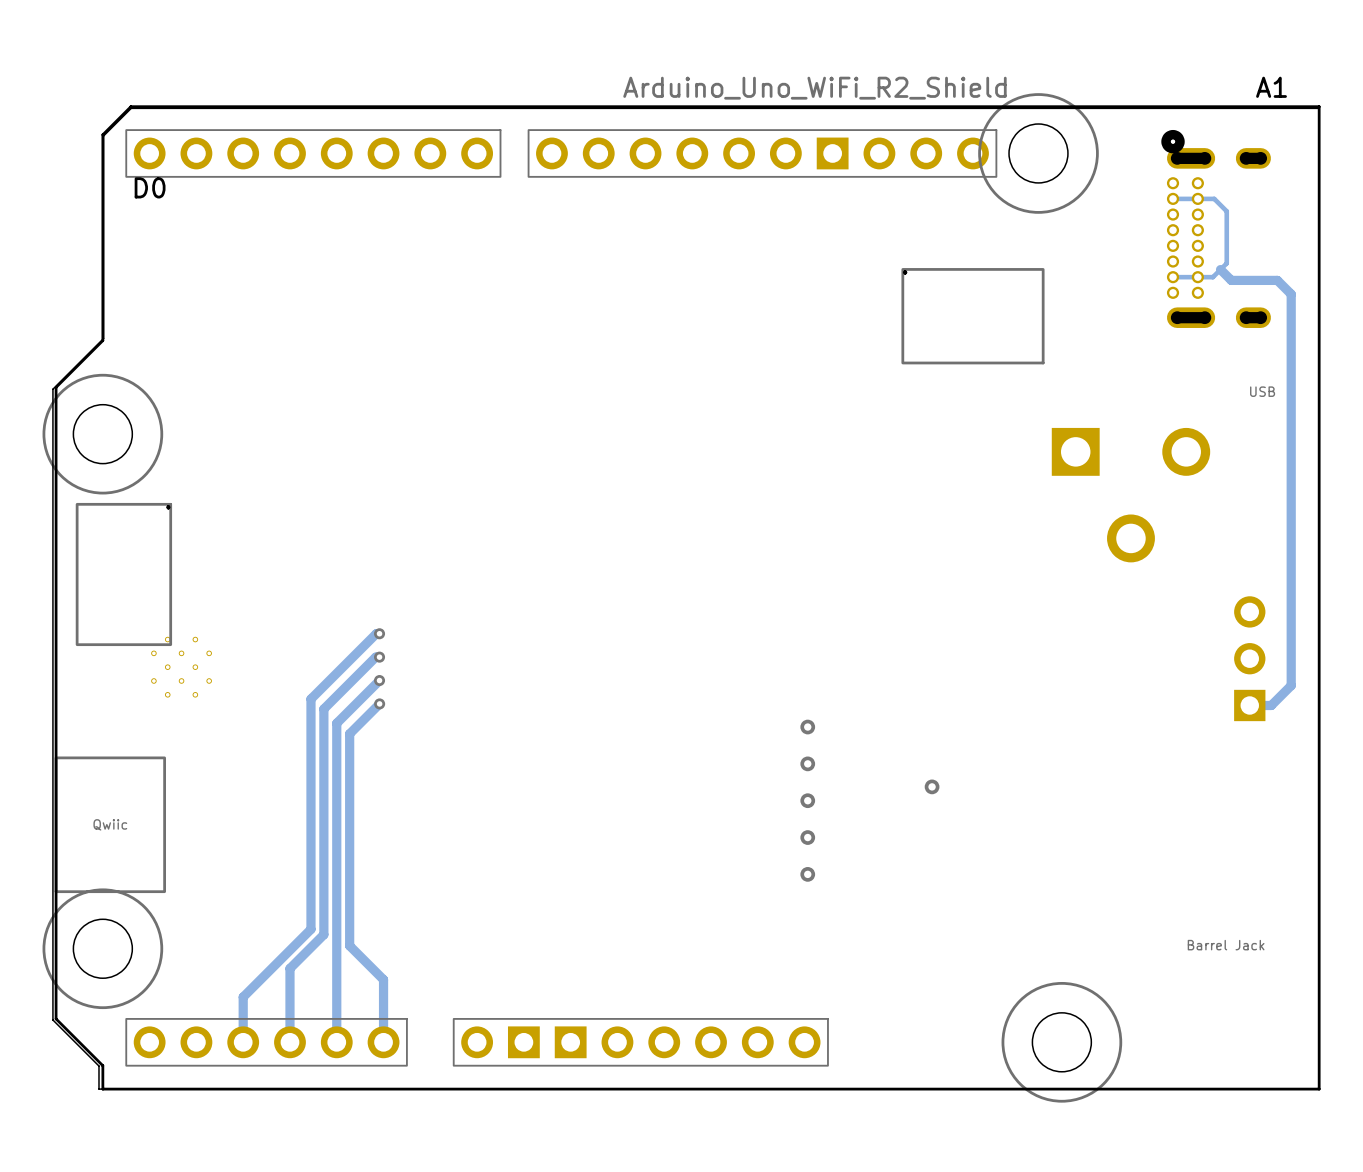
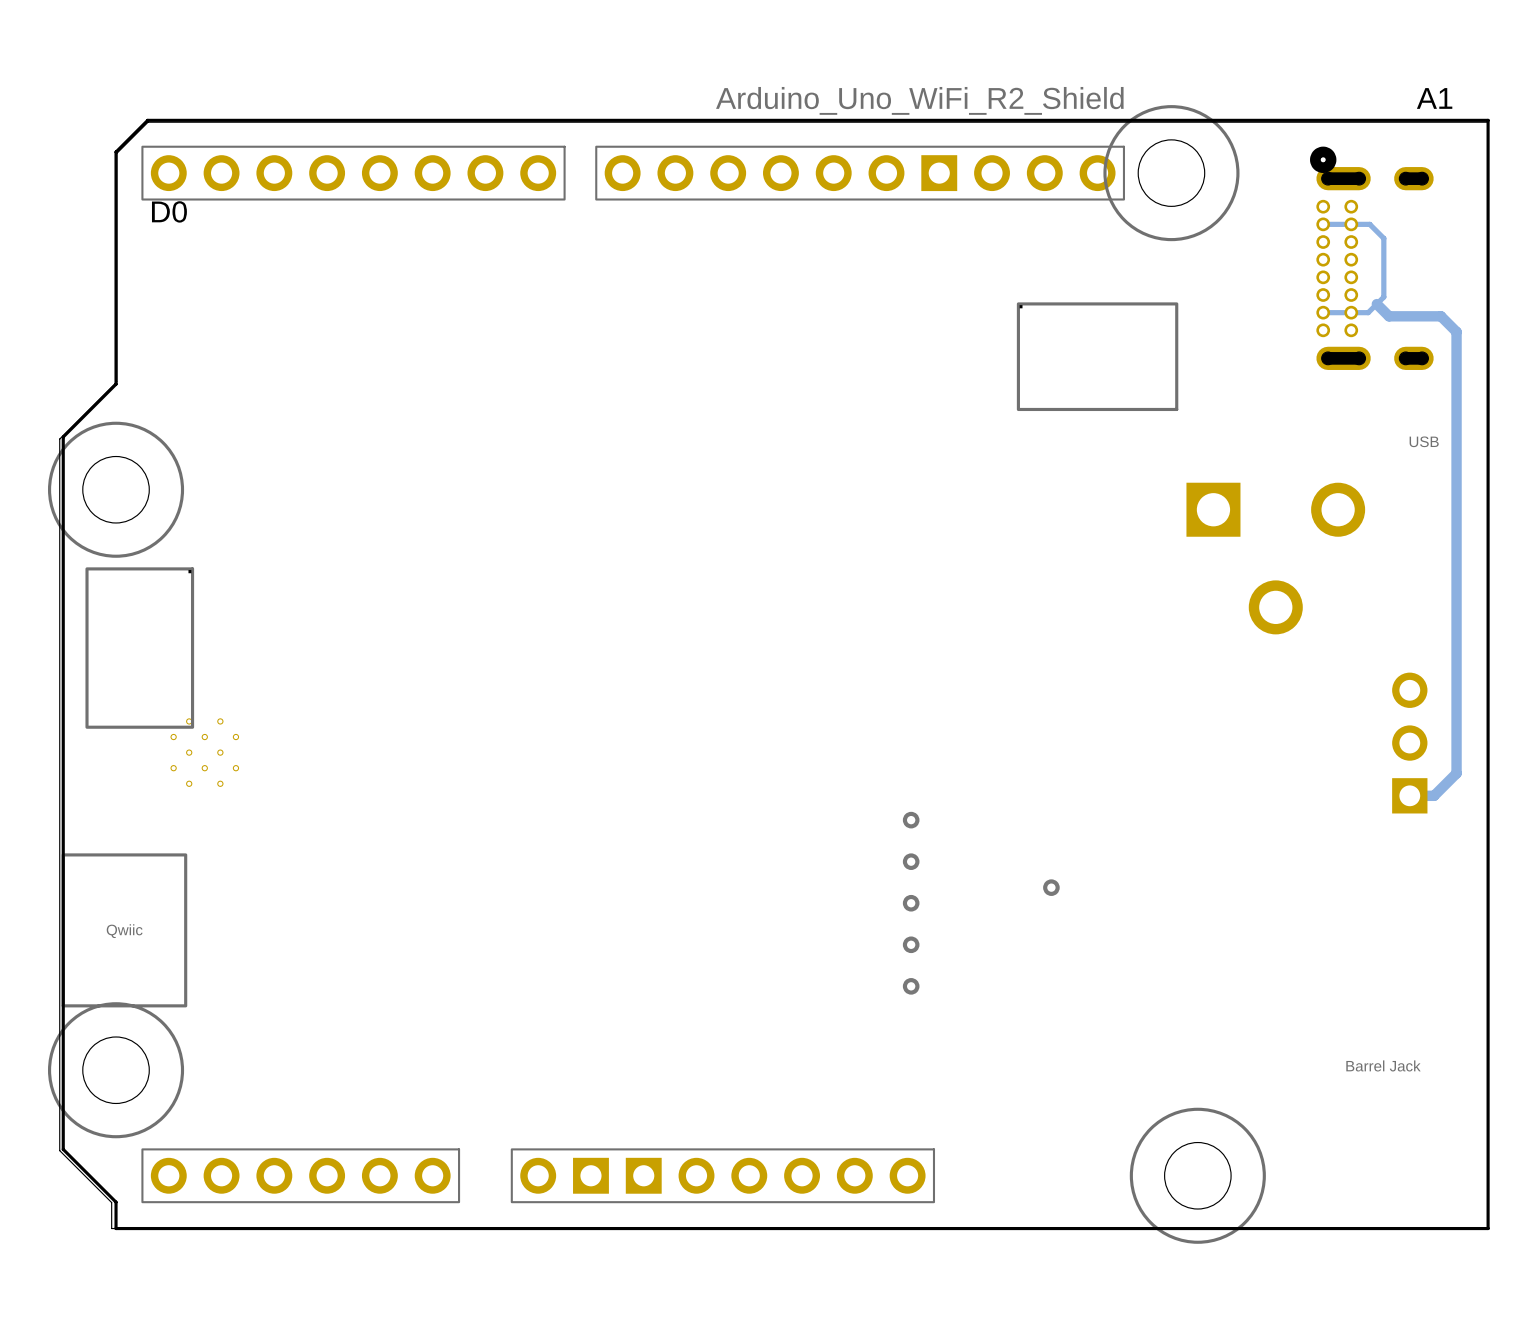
track: (379, 633) (376, 633) (310, 699) (310, 929) (243, 997) (243, 1042) -> none
via: (379, 633) -> none
track: (379, 657) (375, 657) (323, 709) (323, 934) (289, 968) (289, 1042) -> none
via: (379, 657) -> none
track: (379, 680) (336, 723) (336, 1042) -> none
via: (379, 680) -> none
track: (379, 703) (349, 733) (349, 945) (383, 979) (383, 1042) -> none
via: (379, 703) -> none

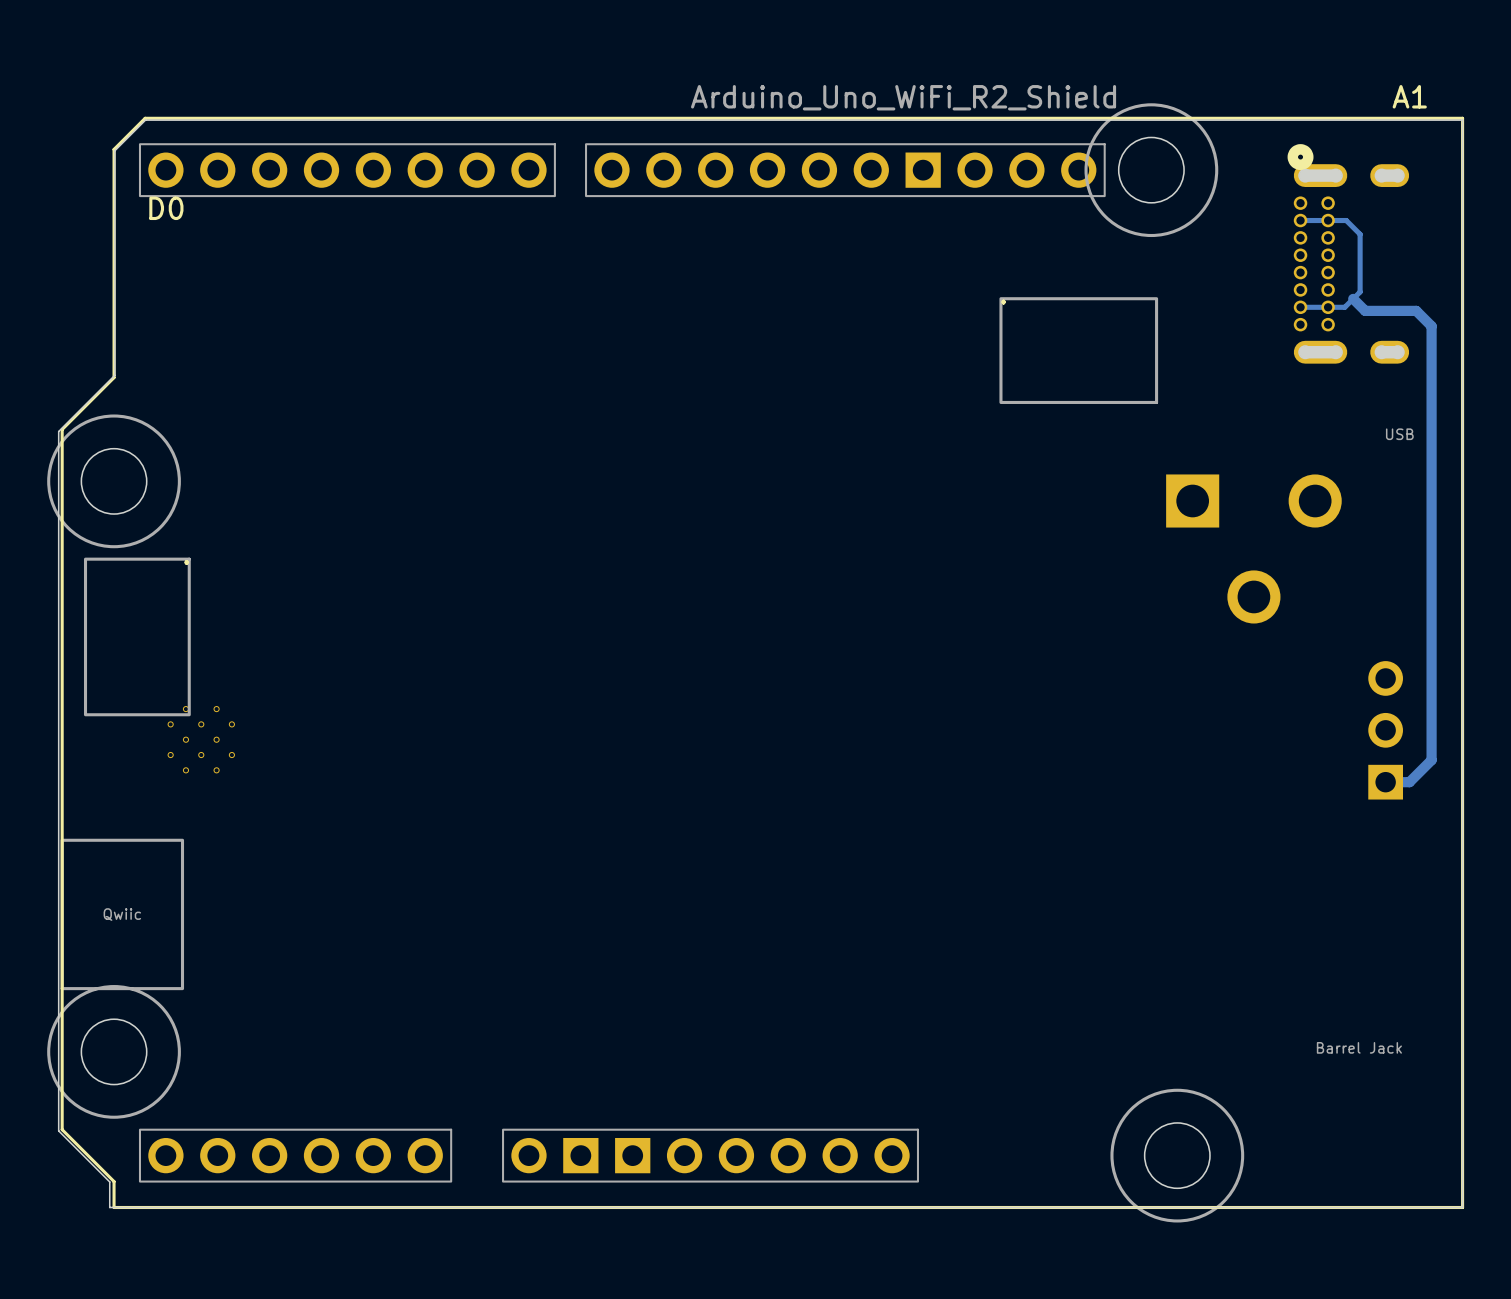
via: (911, 820) -> none
via: (911, 861) -> none
via: (1051, 887) -> none
via: (911, 903) -> none
via: (911, 944) -> none
via: (911, 986) -> none

